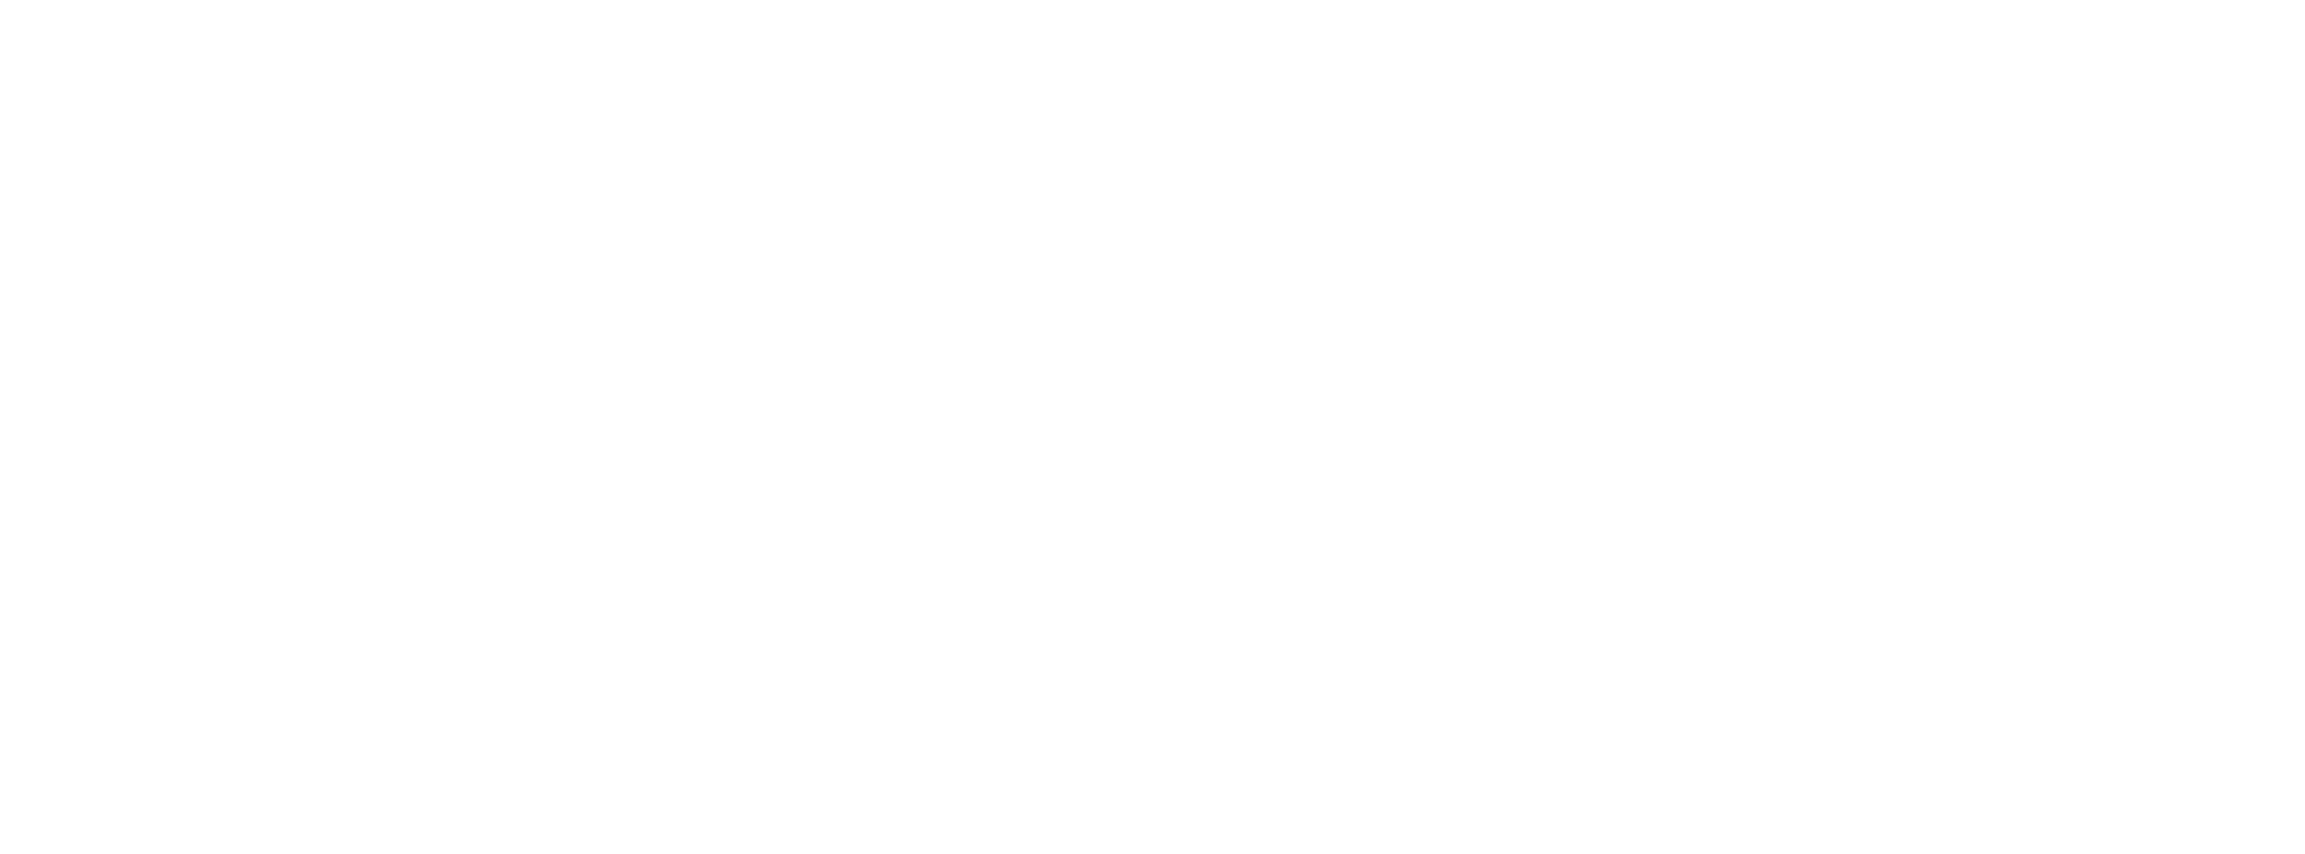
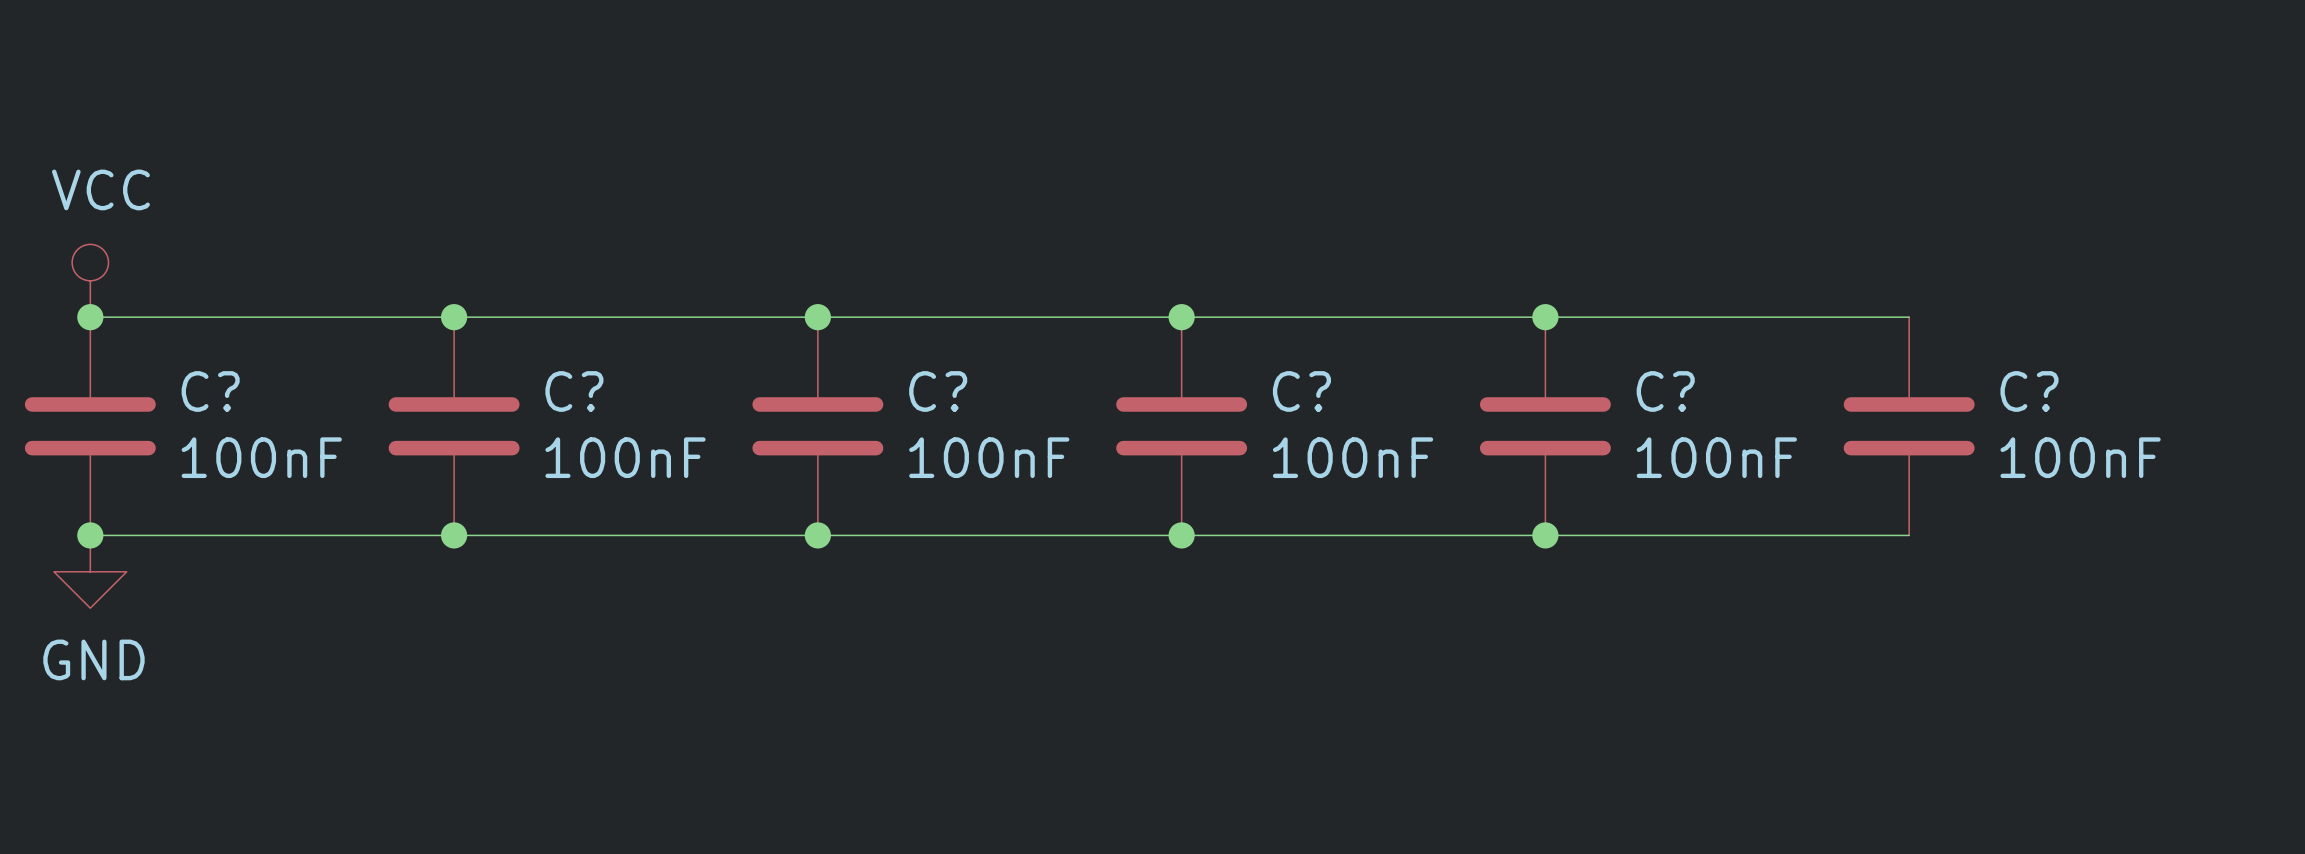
power symbol: none -> VCC (90, 280)
wire: none -> (90, 317) (1909, 317)
junction: none -> (90, 317)
junction: none -> (454, 317)
junction: none -> (817, 317)
junction: none -> (1181, 317)
junction: none -> (1545, 317)
C?: none -> 100nF (90, 426)
C?: none -> 100nF (454, 426)
C?: none -> 100nF (817, 426)
C?: none -> 100nF (1181, 426)
C?: none -> 100nF (1545, 426)
C?: none -> 100nF (1909, 426)
wire: none -> (90, 535) (1909, 535)
junction: none -> (90, 535)
junction: none -> (454, 535)
junction: none -> (817, 535)
junction: none -> (1181, 535)
junction: none -> (1545, 535)
power symbol: none -> GND (90, 571)

